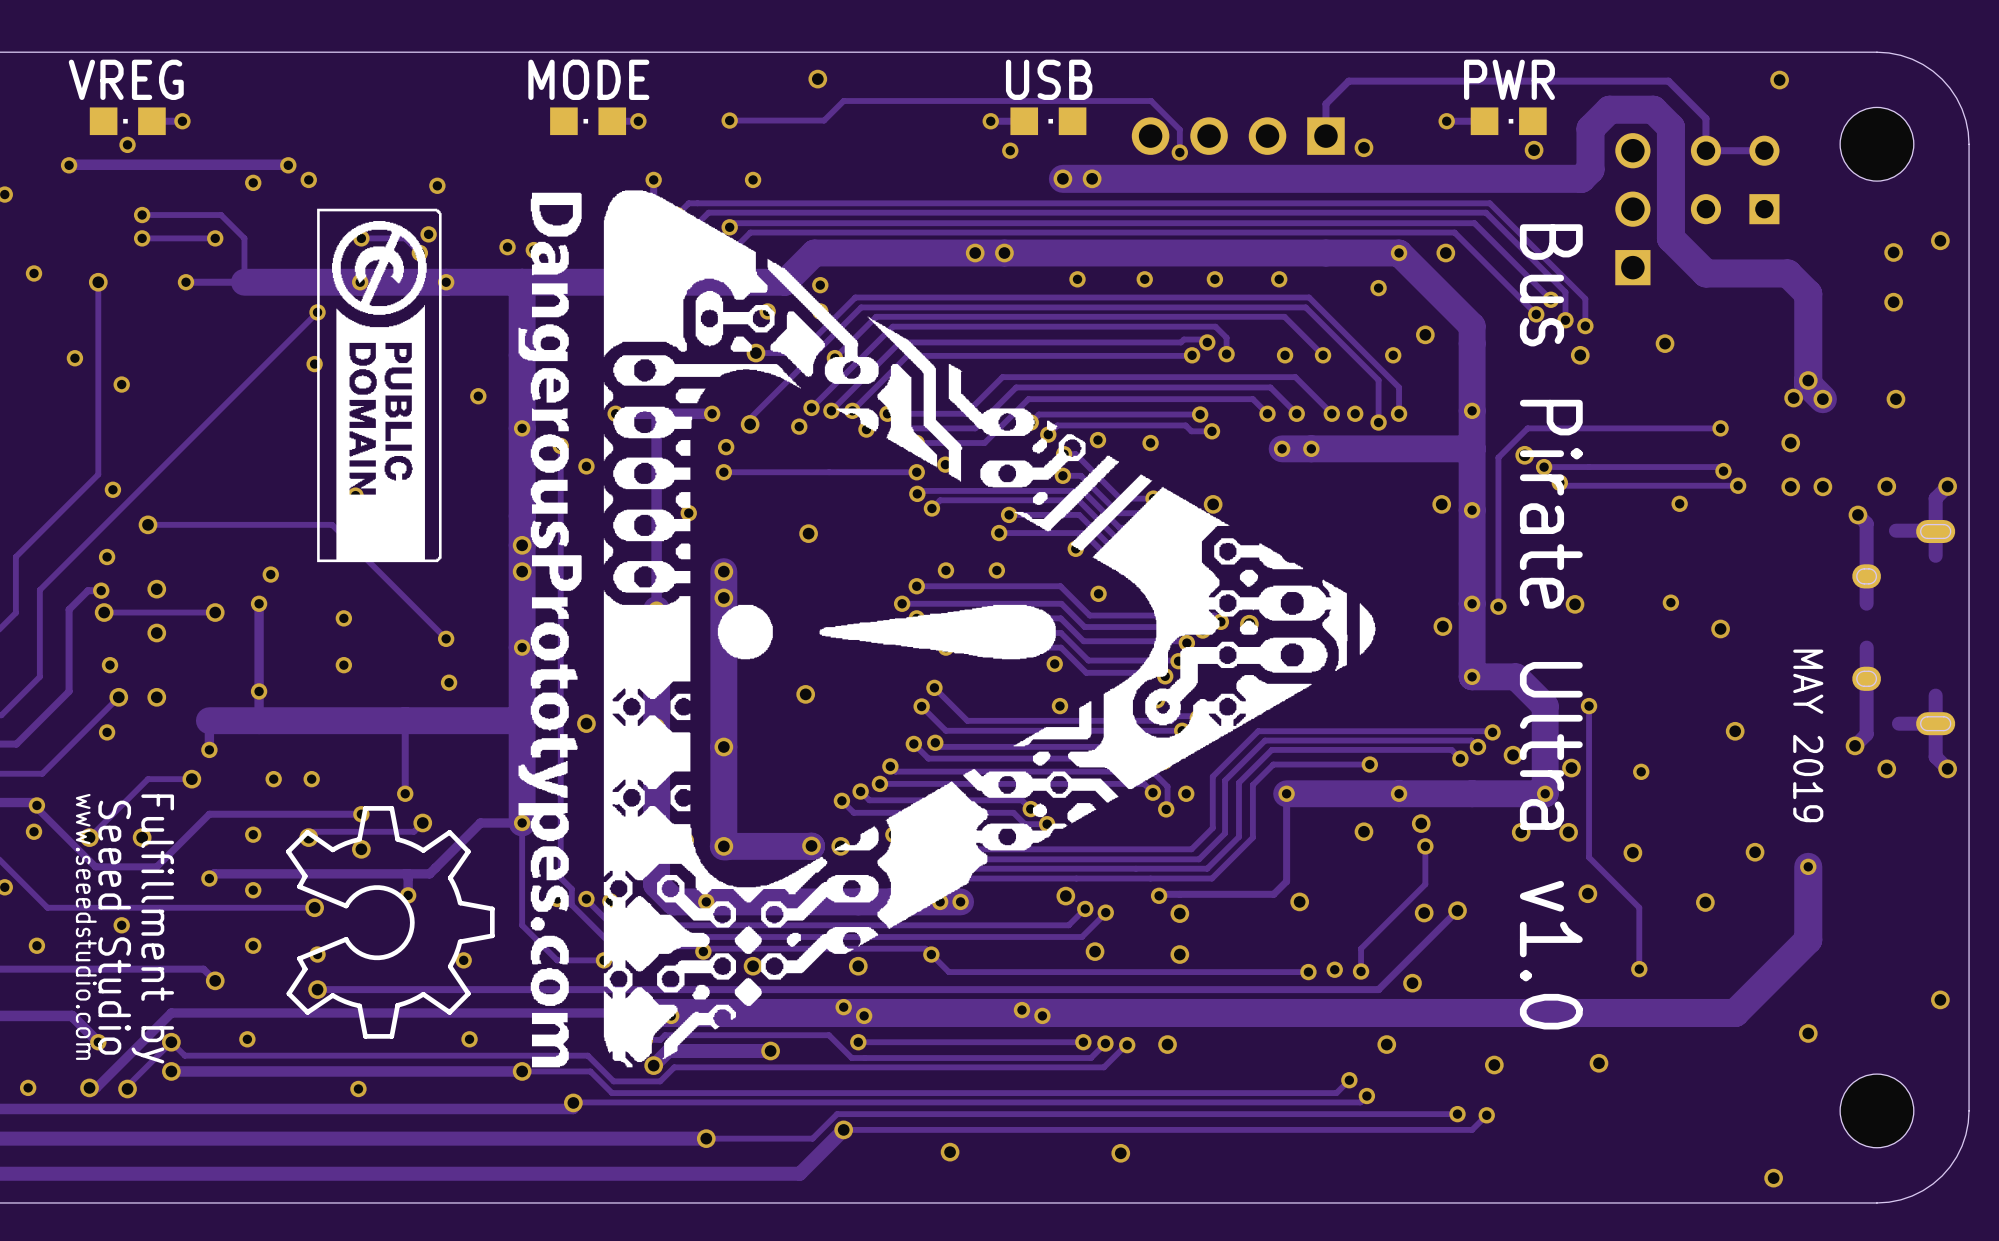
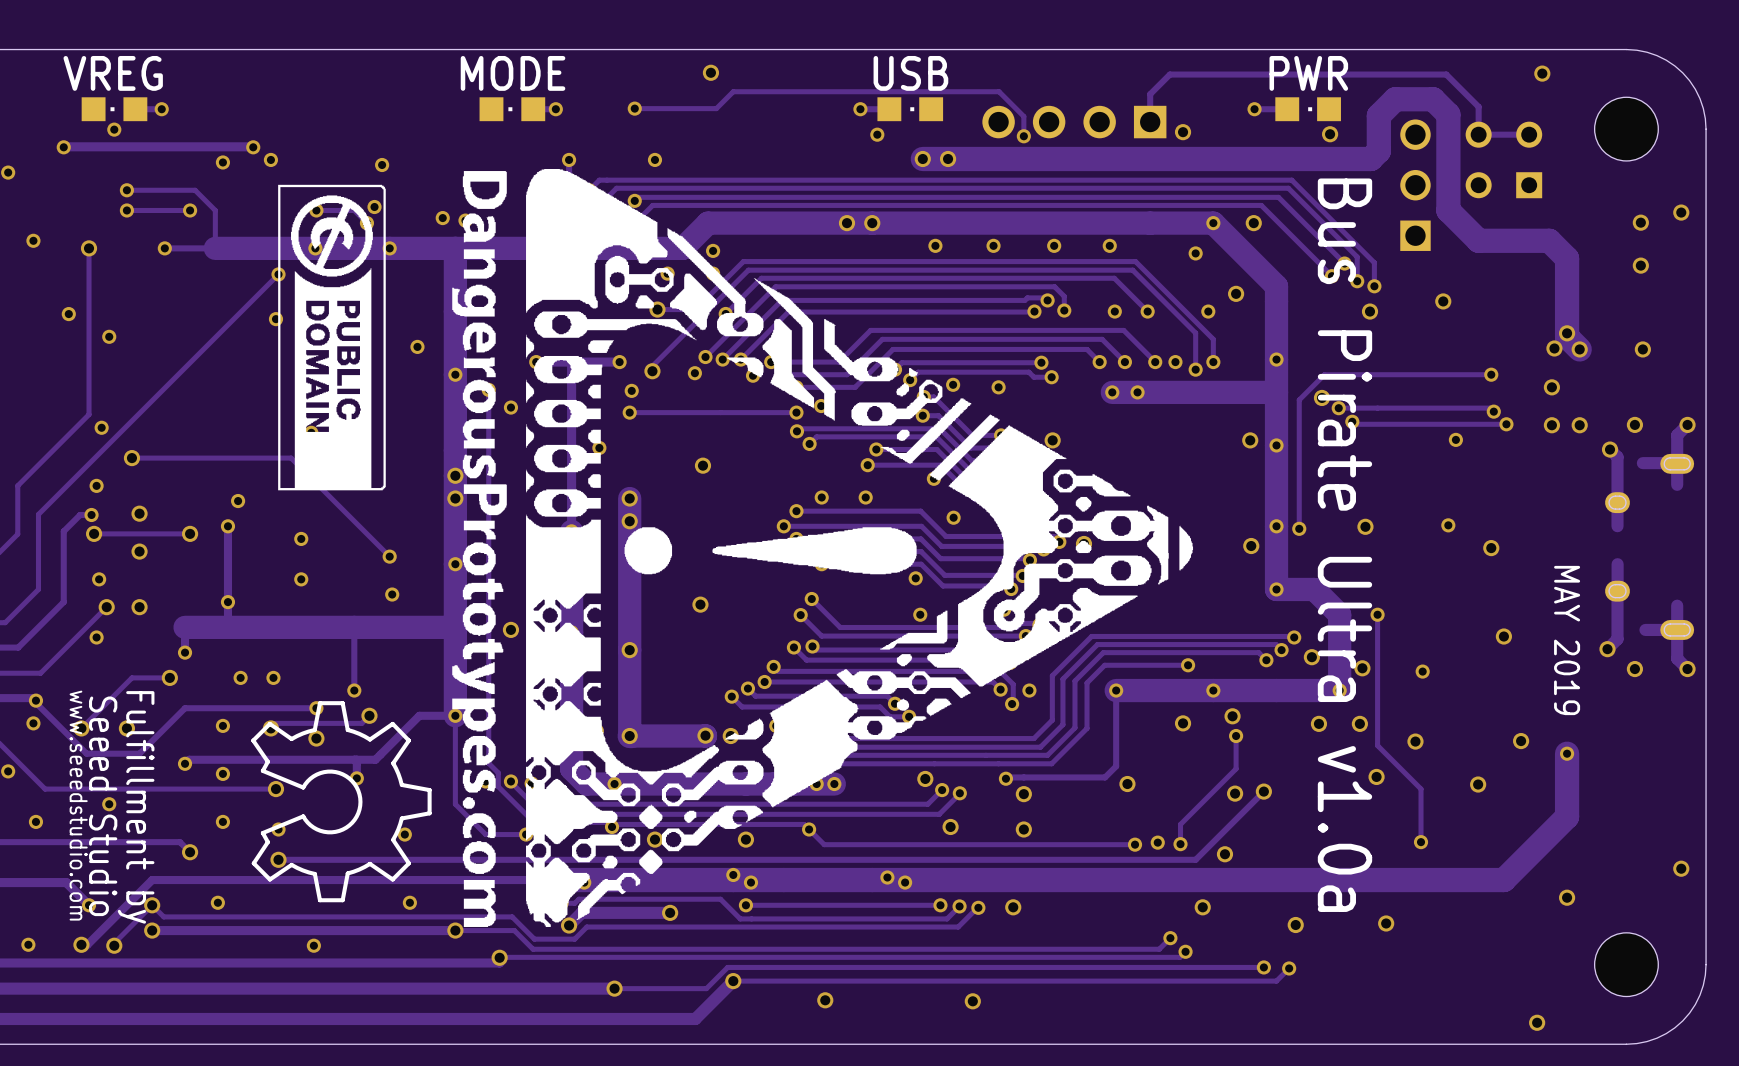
text: Bus Pirate Ultra v1.0 (1551, 626) -> Bus Pirate Ultra v1.0a (1344, 545)

